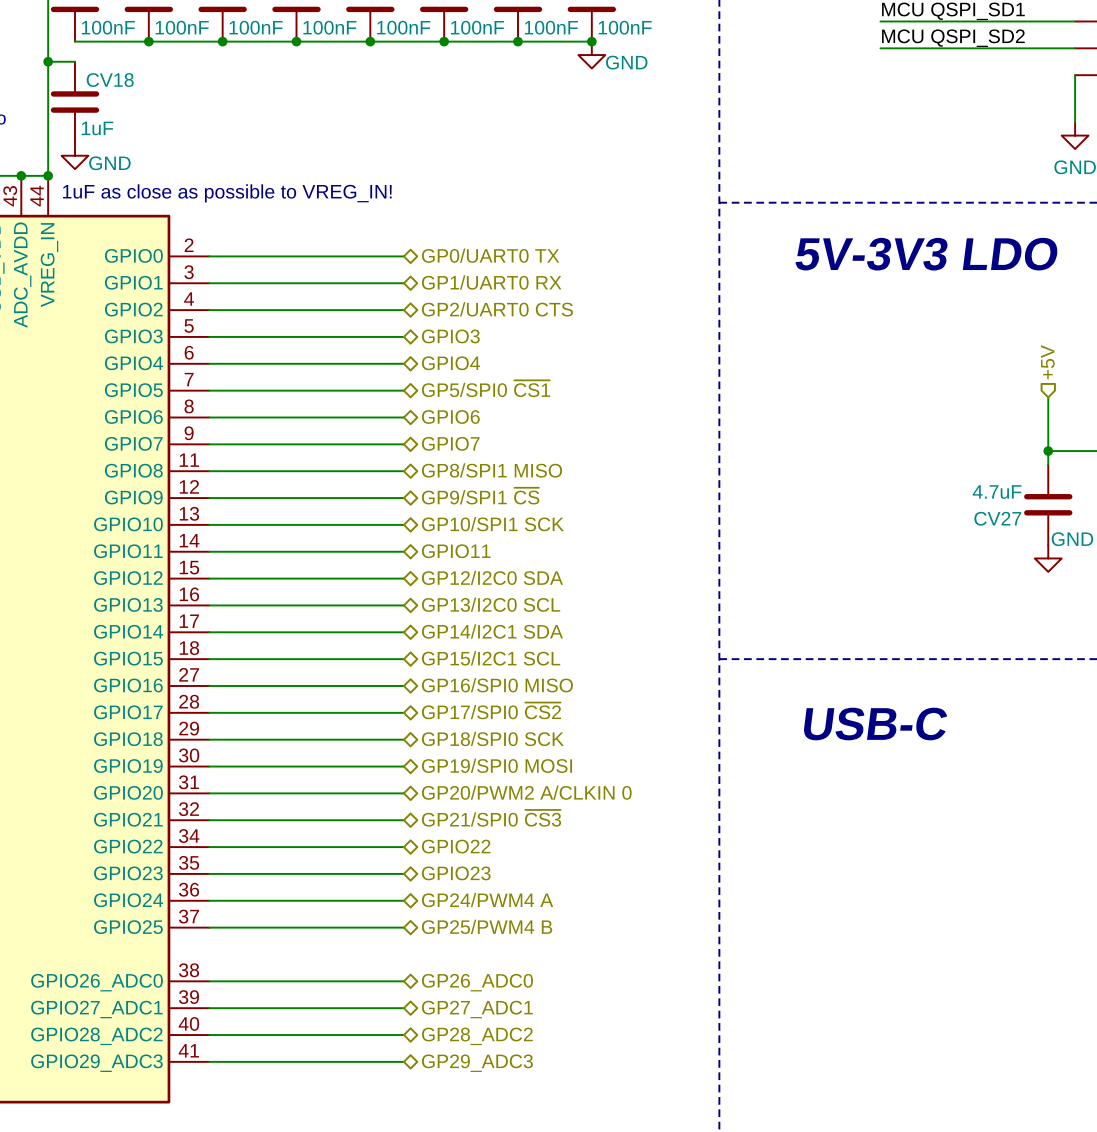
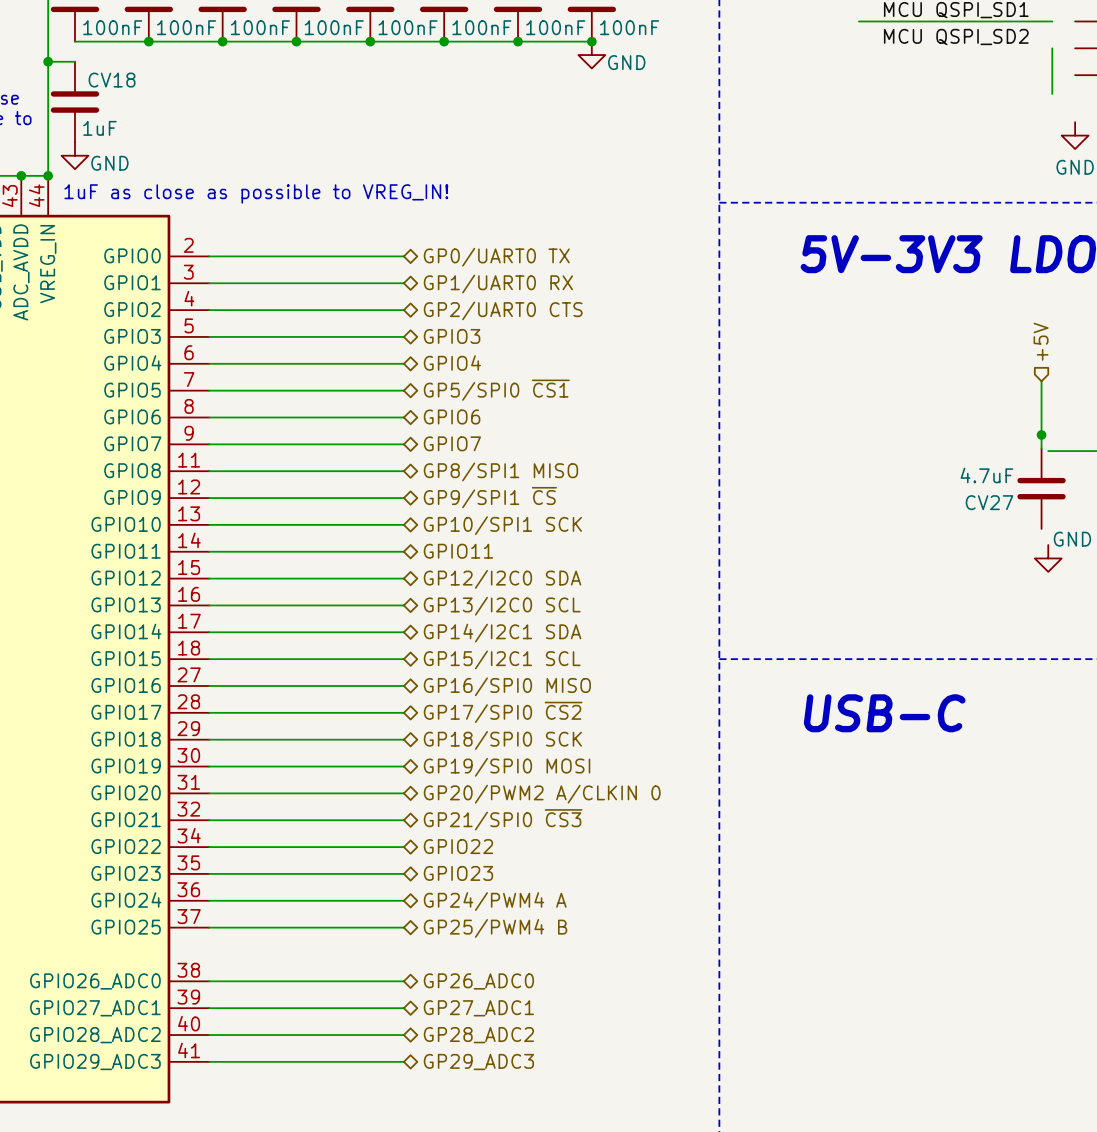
wire: none -> (858, 21) (880, 21)
wire: (1052, 21) (1075, 21) -> none
wire: (880, 48) (1075, 48) -> none
wire: none -> (1052, 48) (1052, 93)
wire: (1075, 75) (1075, 122) -> none
hierarchical label position: +5V (1047, 362) -> +5V (1041, 341)
wire: (1048, 397) (1048, 464) -> (1041, 381) (1041, 448)
junction position: (1048, 451) -> (1041, 434)
CV27 position: (1048, 504) -> (1041, 488)
text position: USB-C (875, 724) -> USB-C (884, 713)

